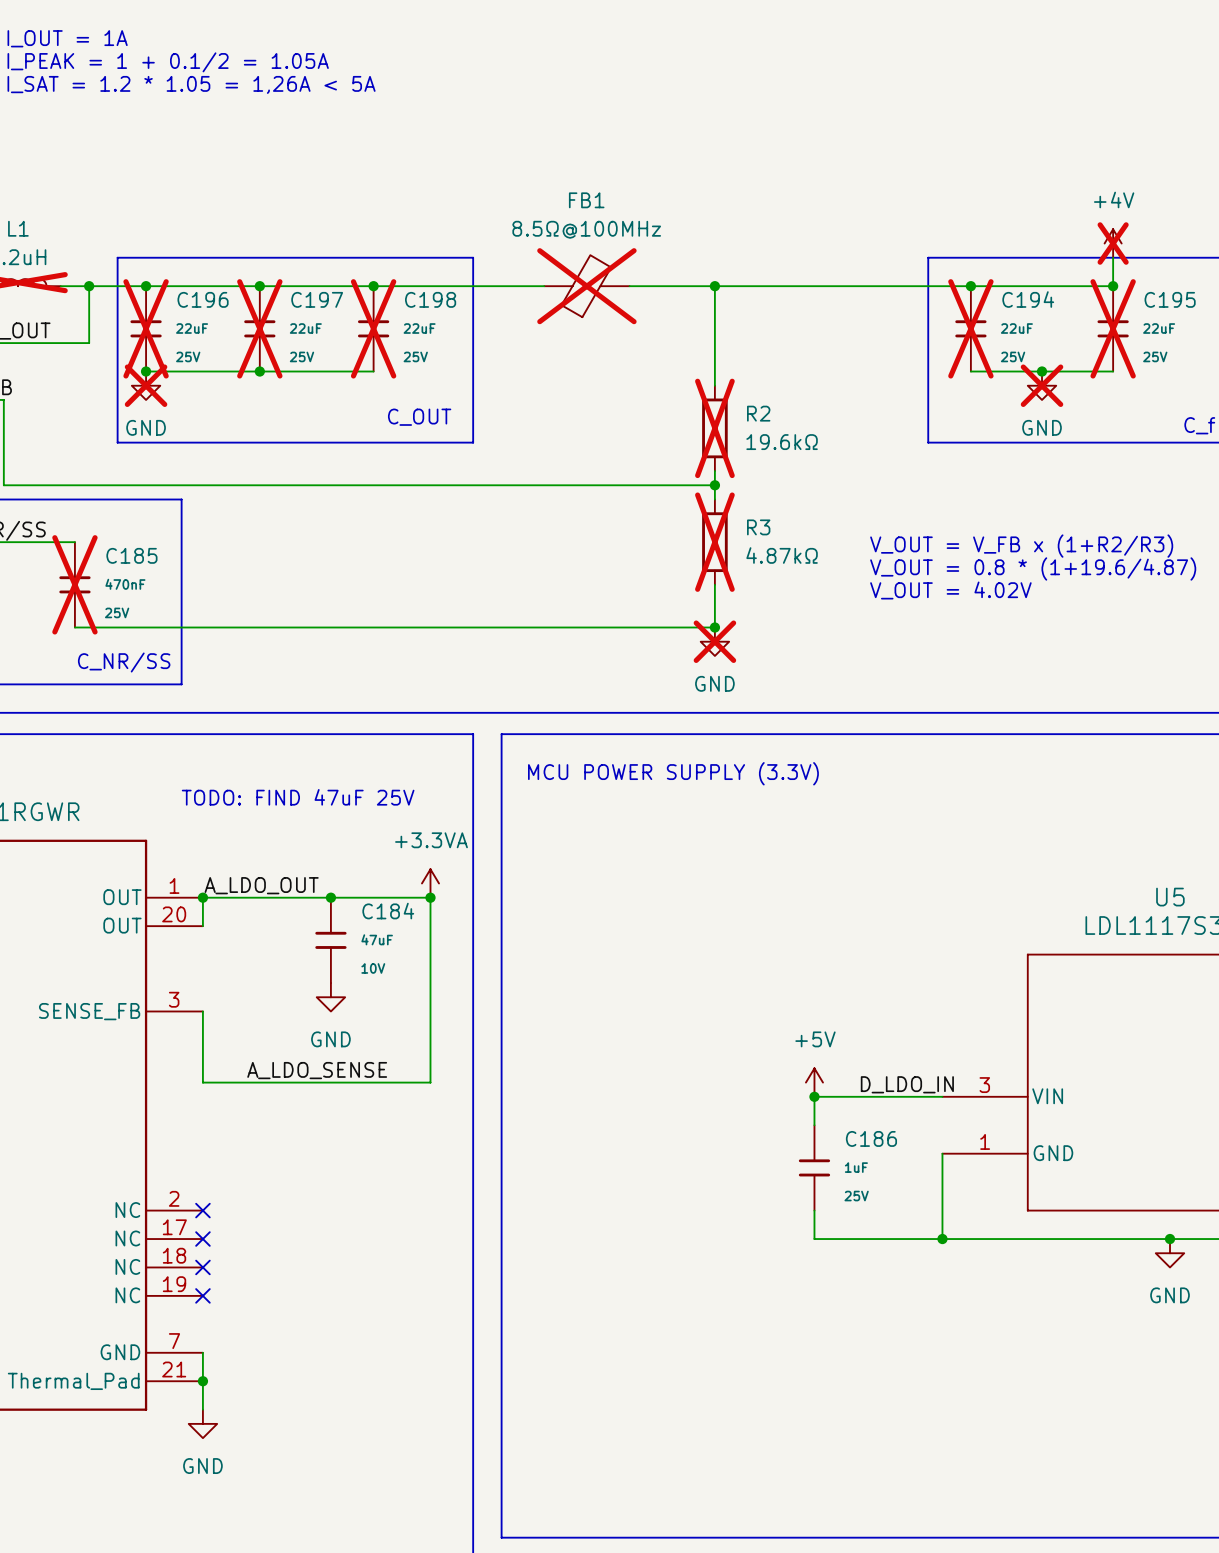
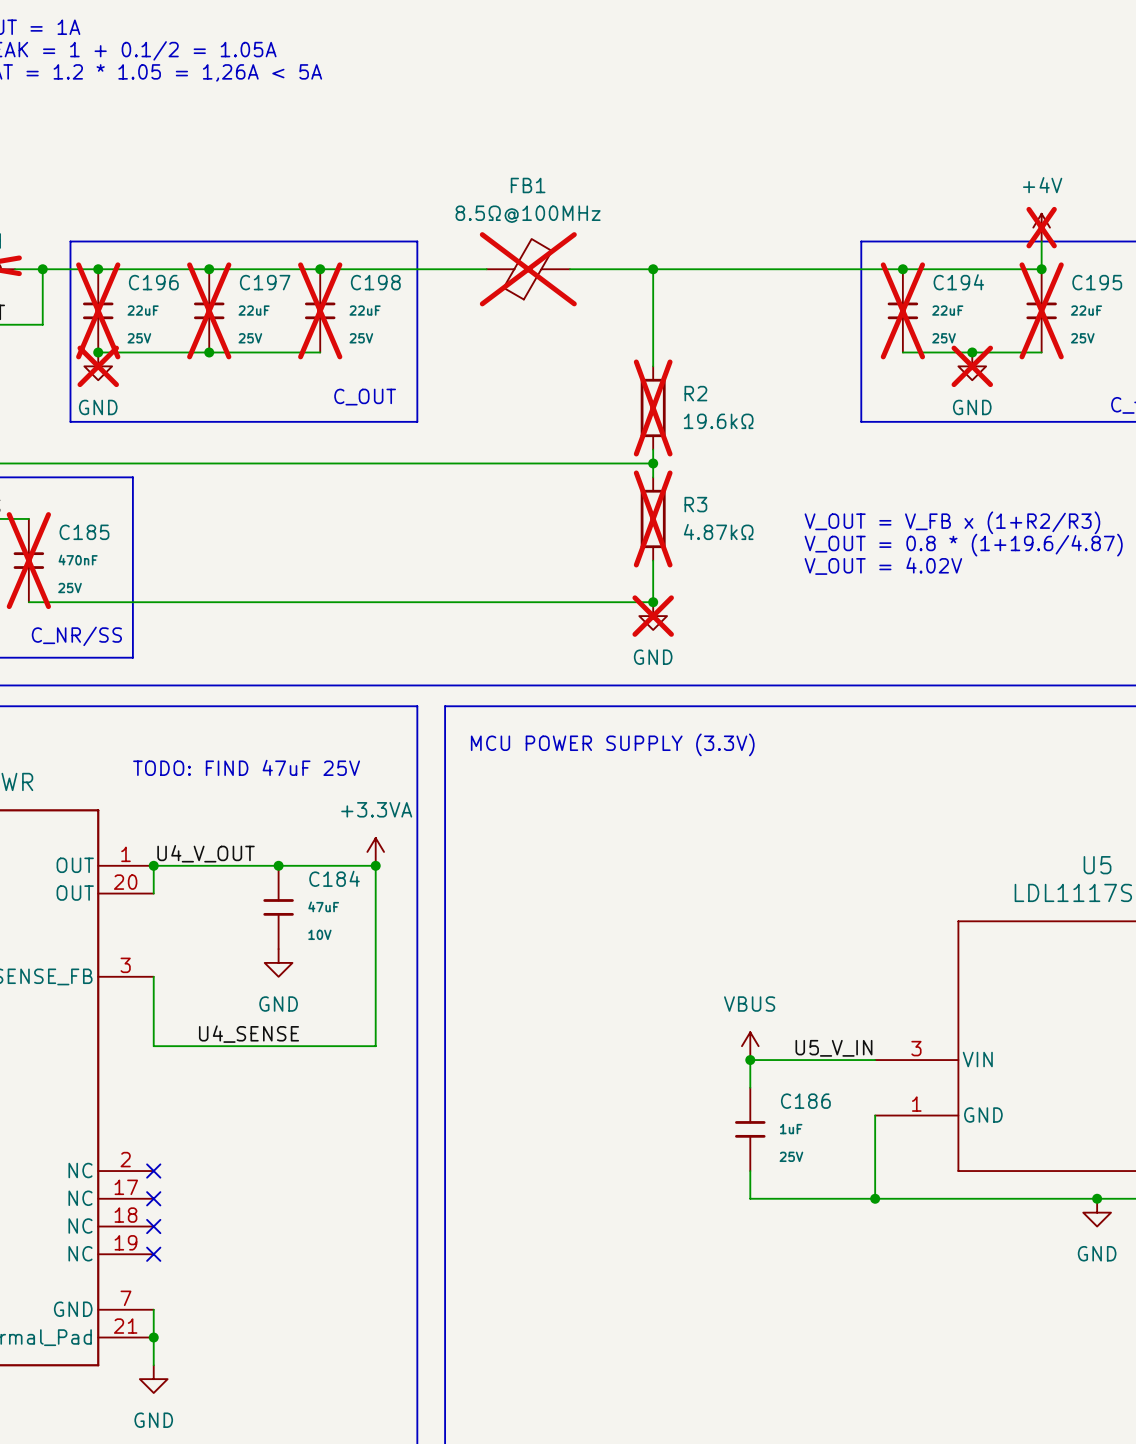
label: A_LDO_OUT (261, 885) -> U4_V_OUT (206, 853)
label: A_LDO_SENSE (317, 1070) -> U4_SENSE (248, 1034)
power symbol: +5V (814, 1082) -> VBUS (750, 1046)
label: D_LDO_IN (907, 1084) -> U5_V_IN (833, 1048)

